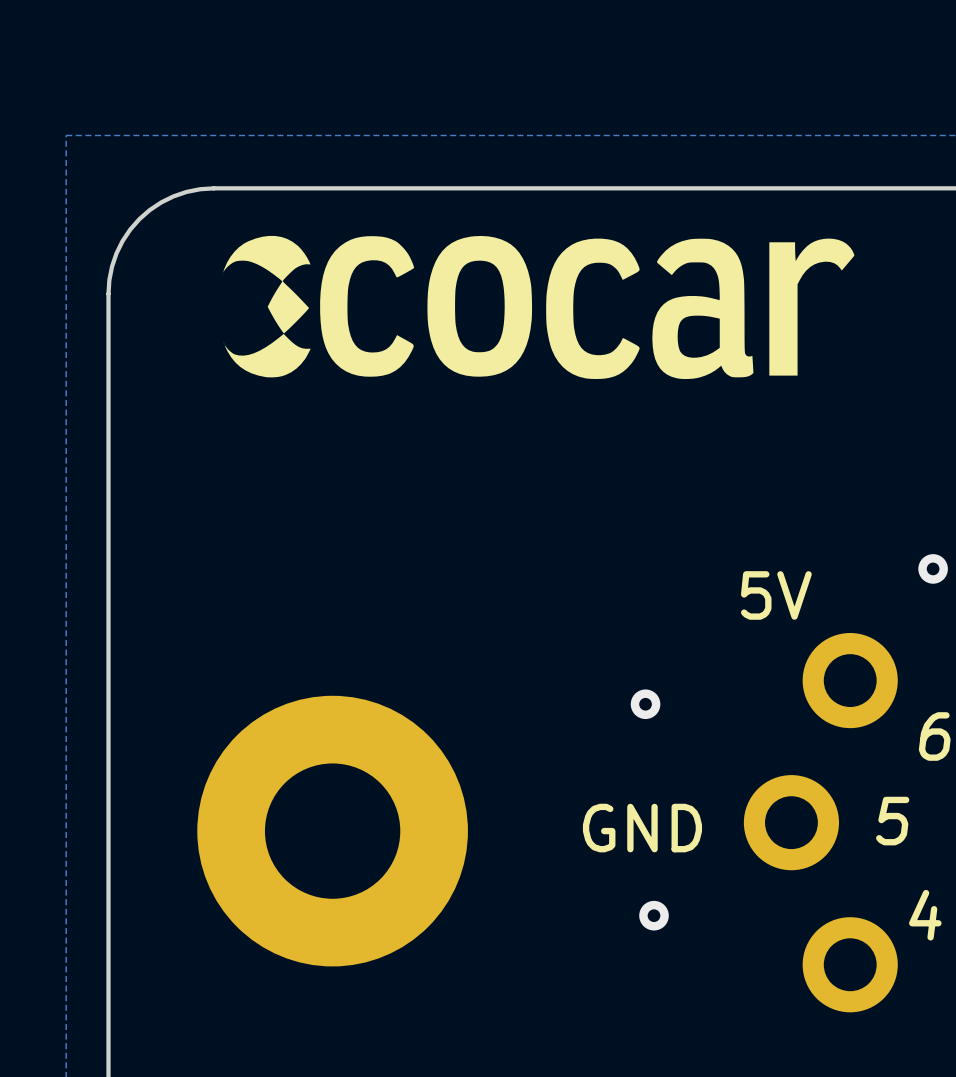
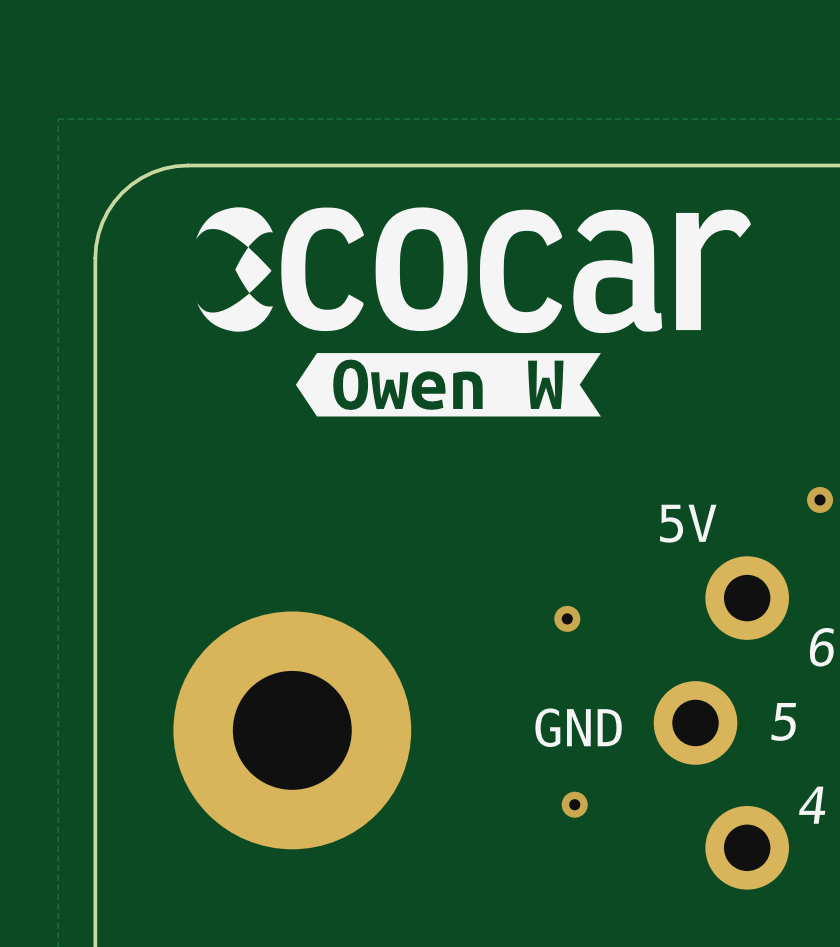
drawing: none -> [295, 353, 601, 417]

